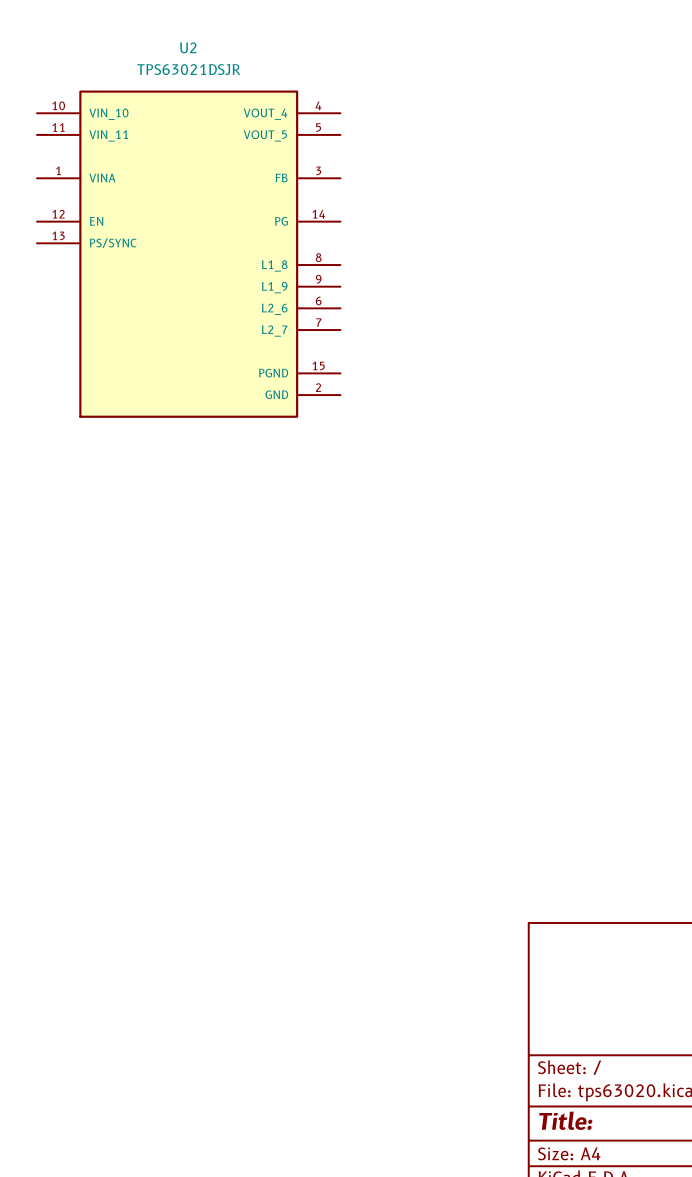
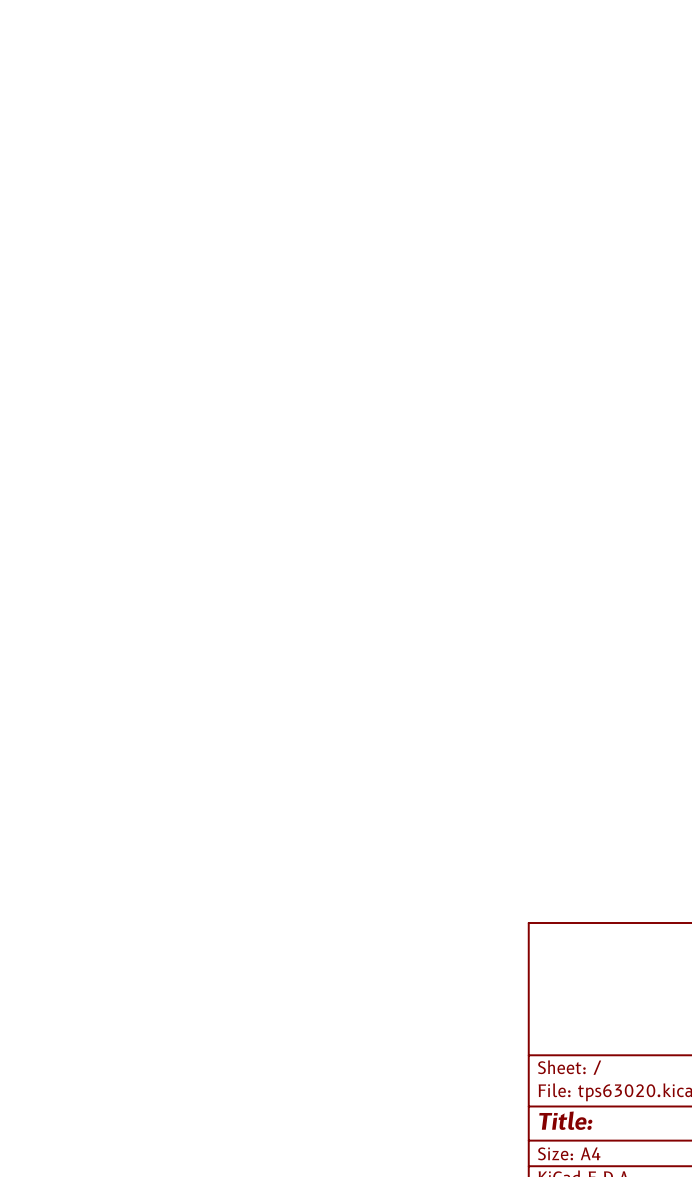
U2: TPS63021DSJR (188, 254) -> none

